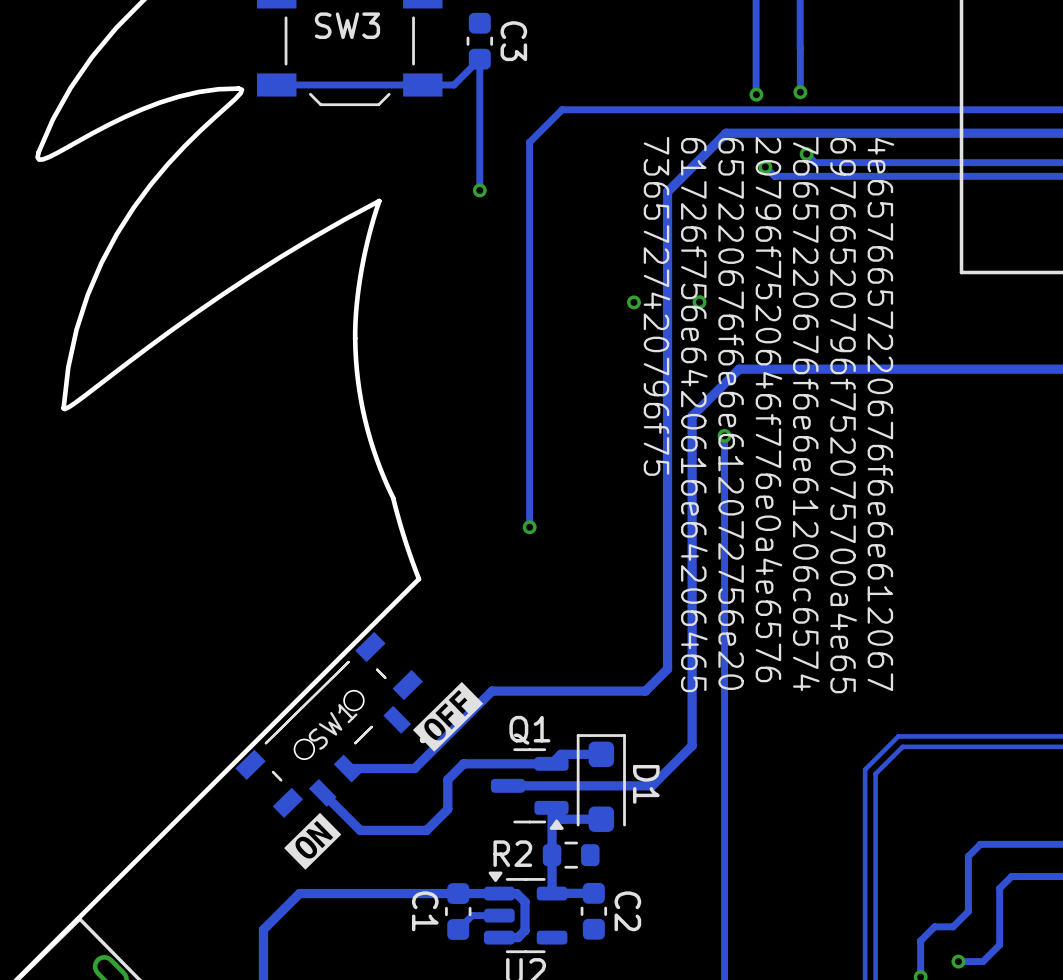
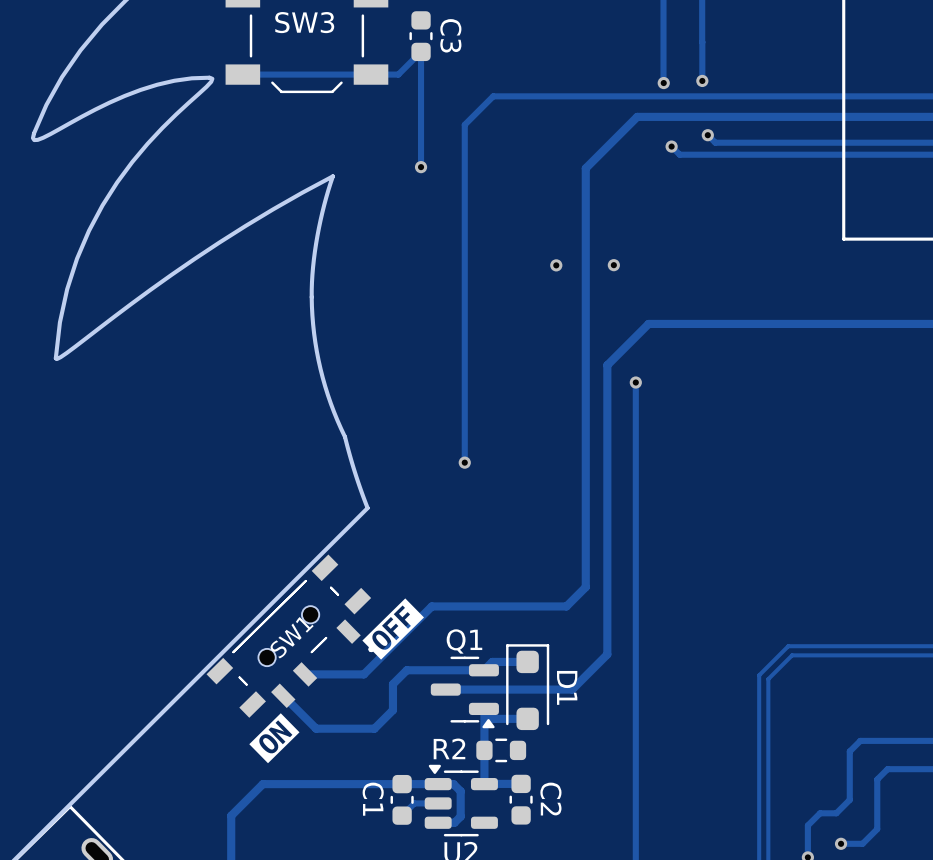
text: 7365727420796f75 (657, 306) -> none
text: 20796f7520646f776e0a4e6576 (768, 409) -> none
text: 657220676f6e6e612072756e20 (731, 413) -> none
text: 76657220676f6e6e61206c6574 (806, 413) -> none
text: 4e6576657220676f6e6e612067 (880, 414) -> none
text: 61726f756e6420616e64206465 (694, 415) -> none
text: 69766520796f752075700a4e65 (843, 415) -> none

